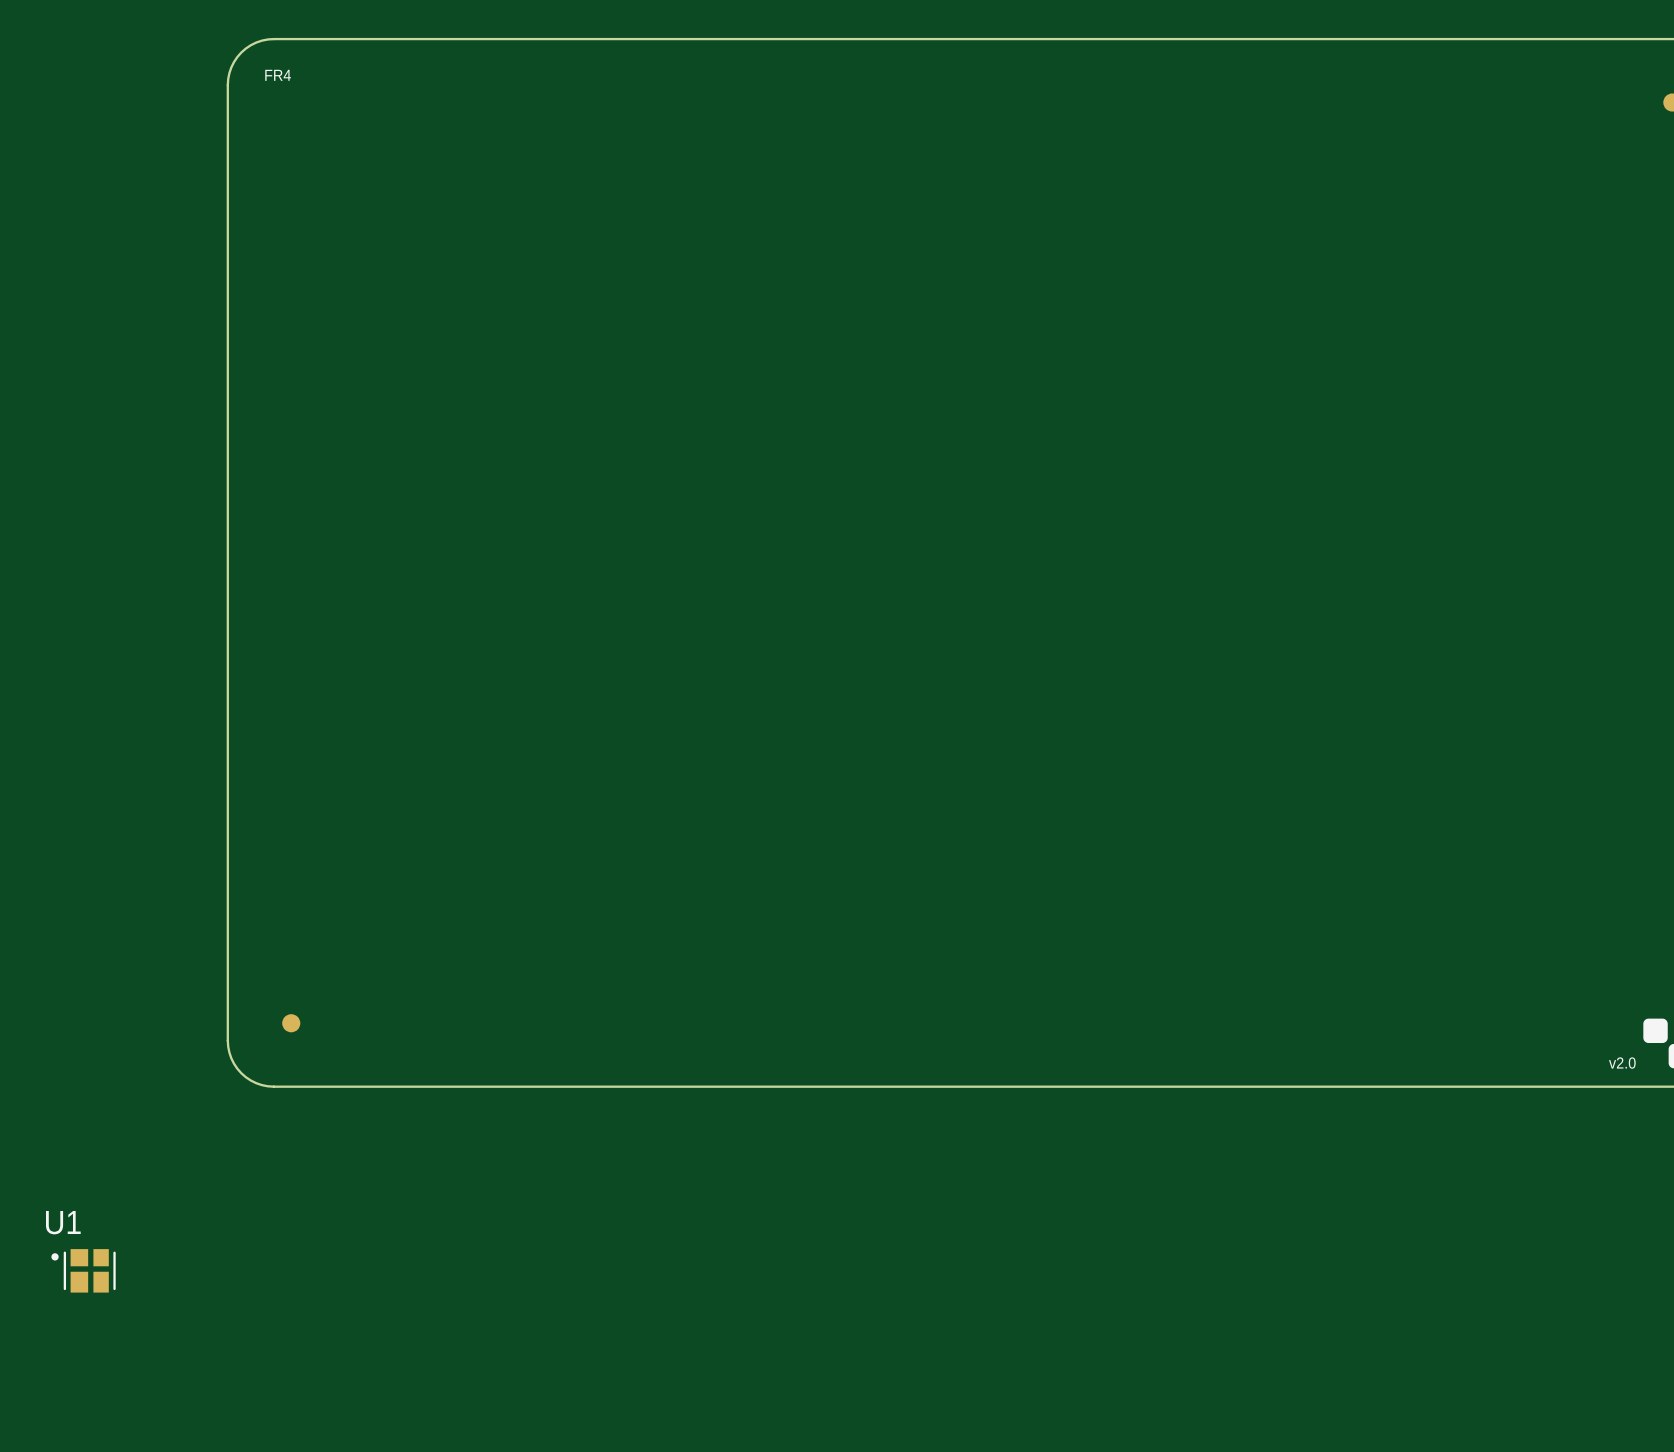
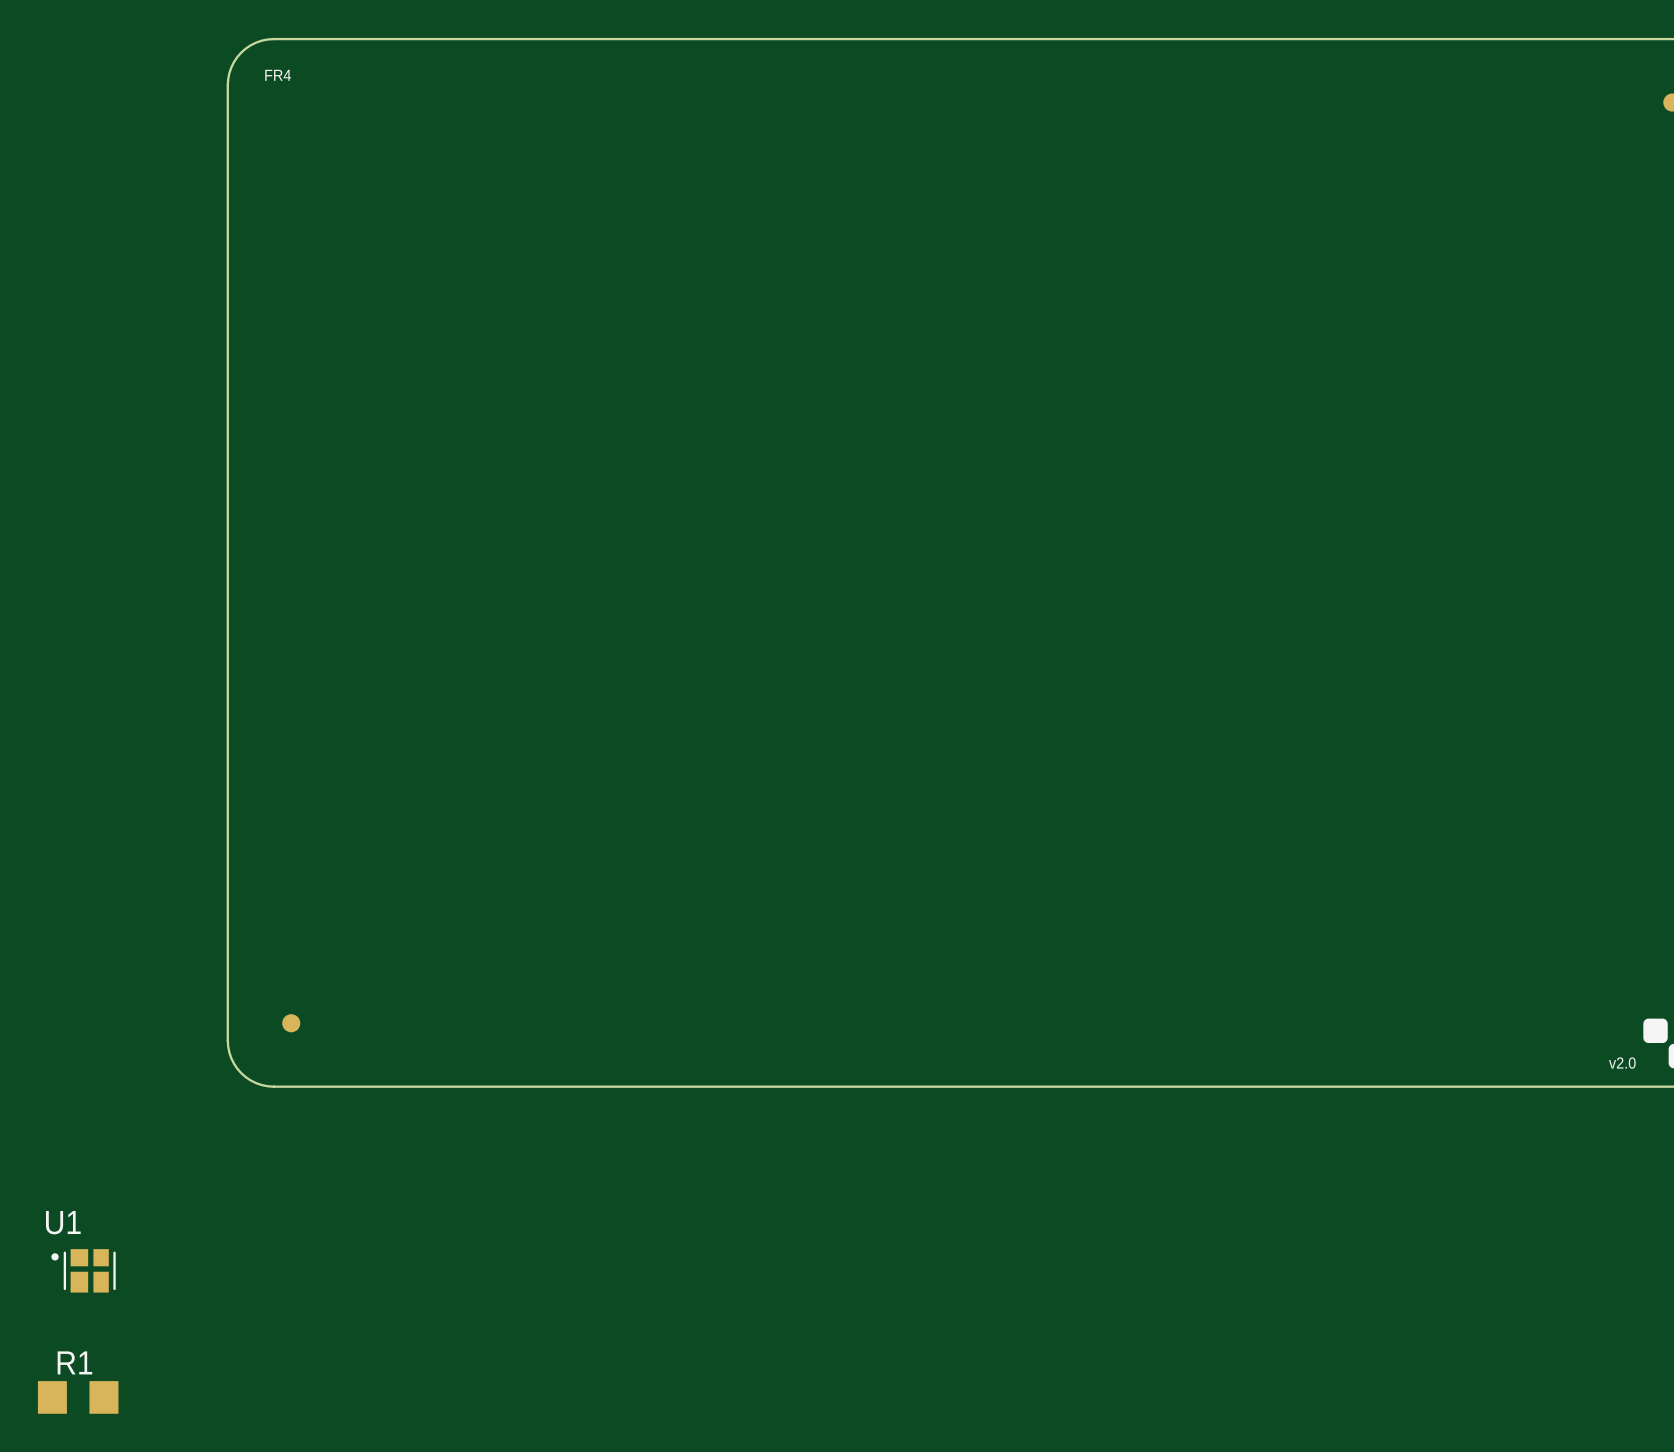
R1: none -> (78, 1397)

